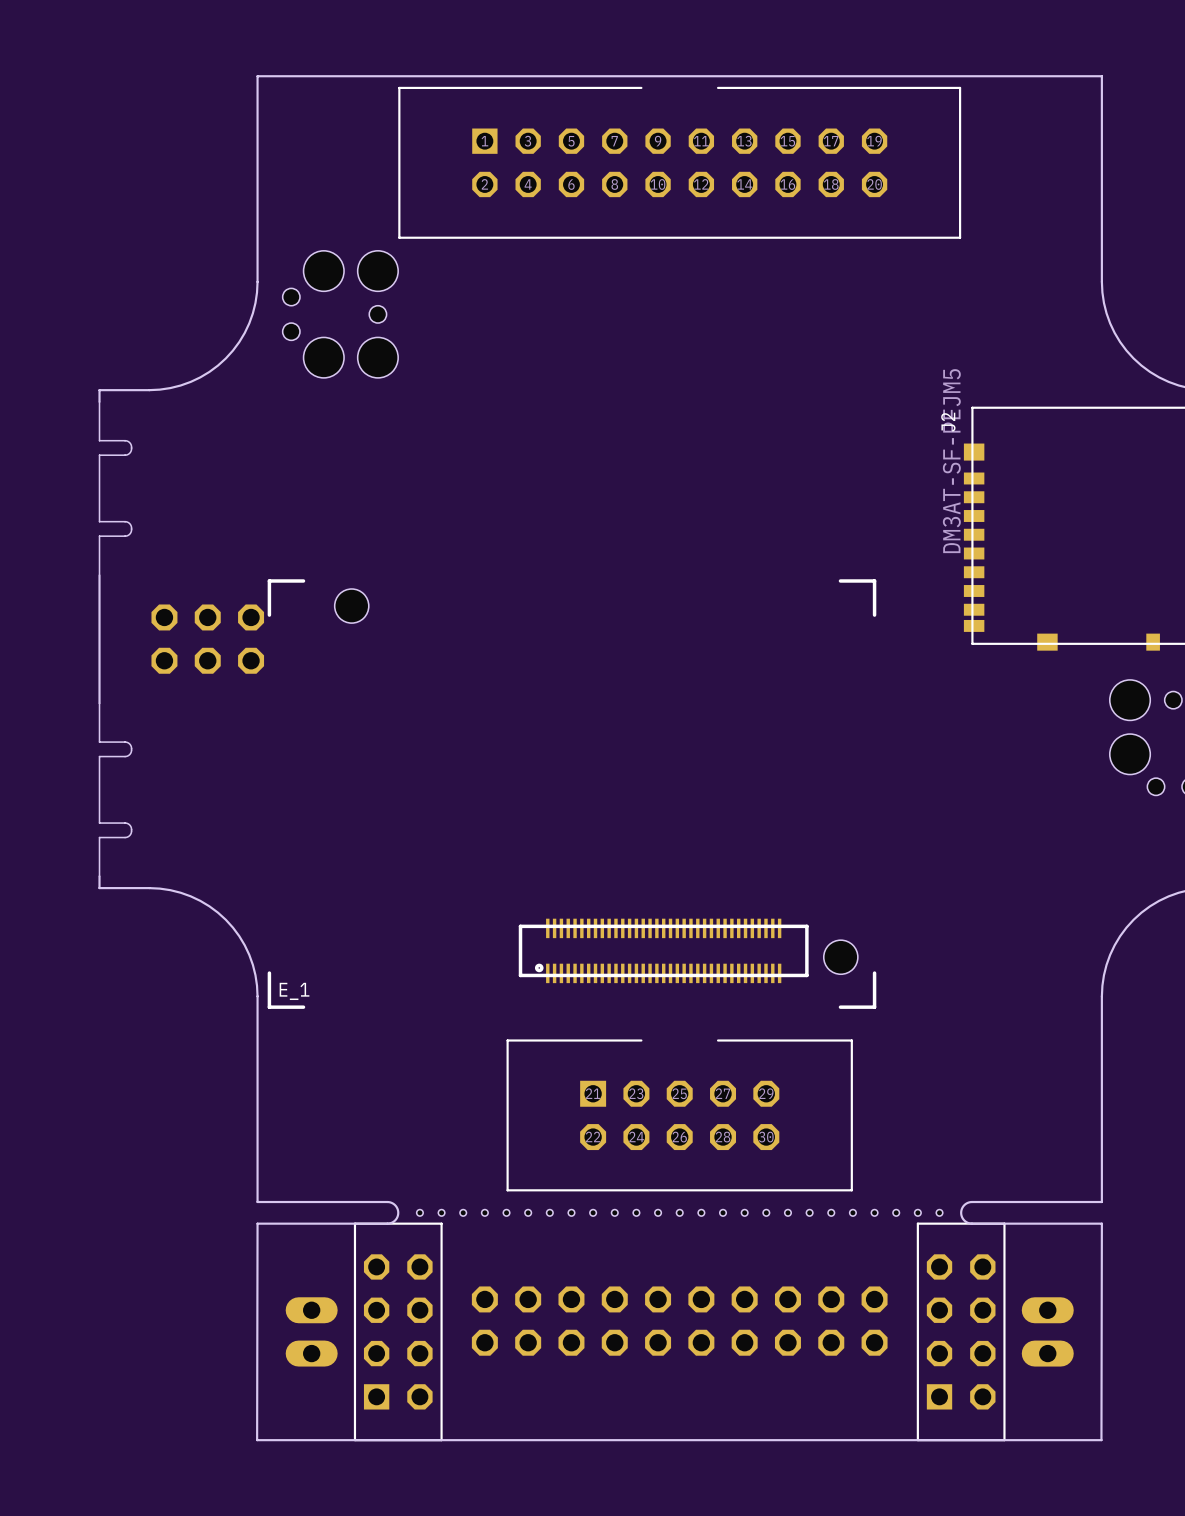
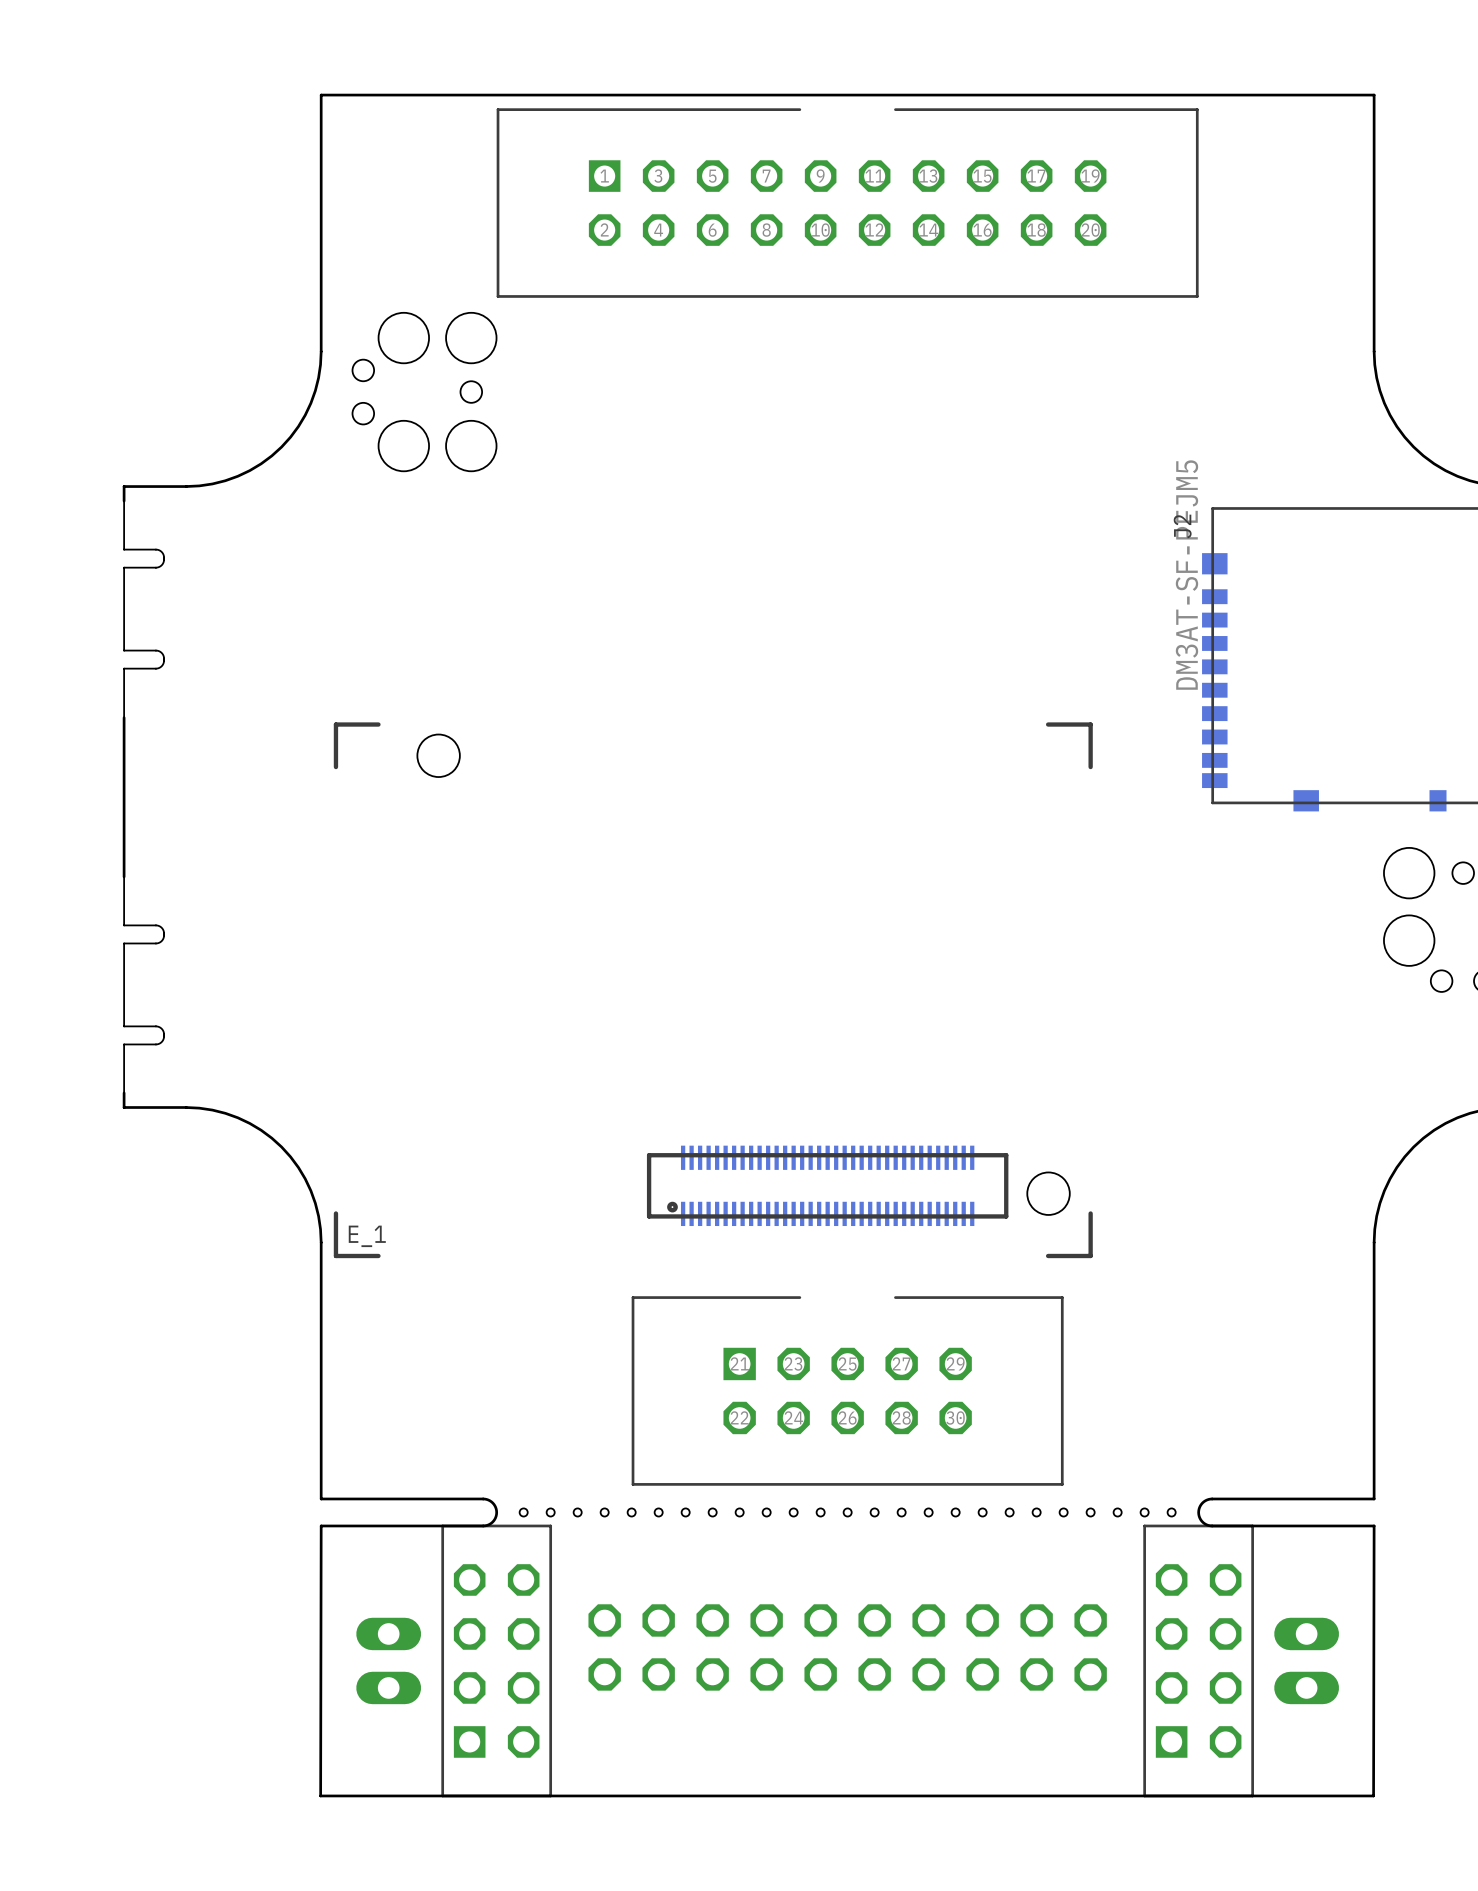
part: (207, 639) -> none

